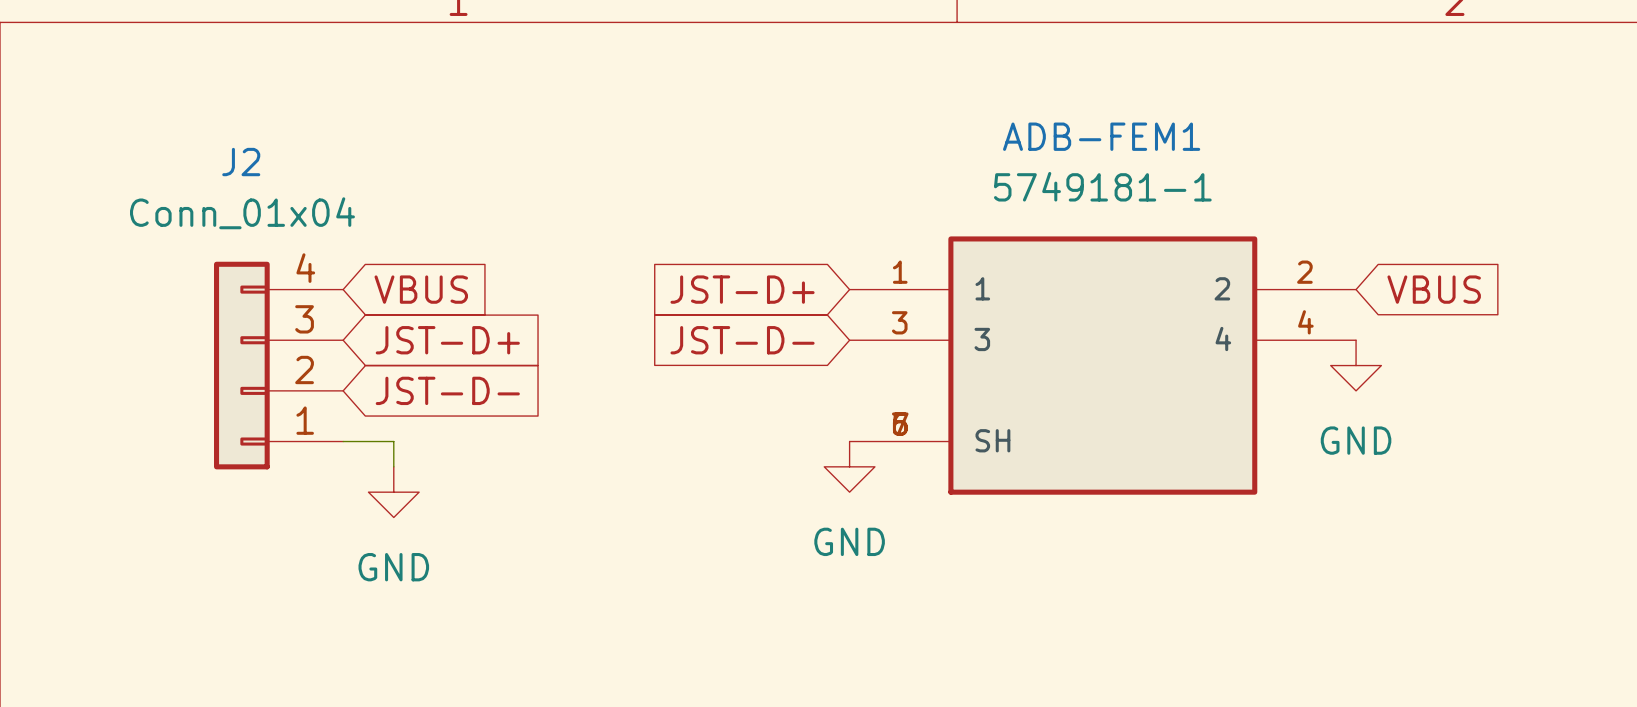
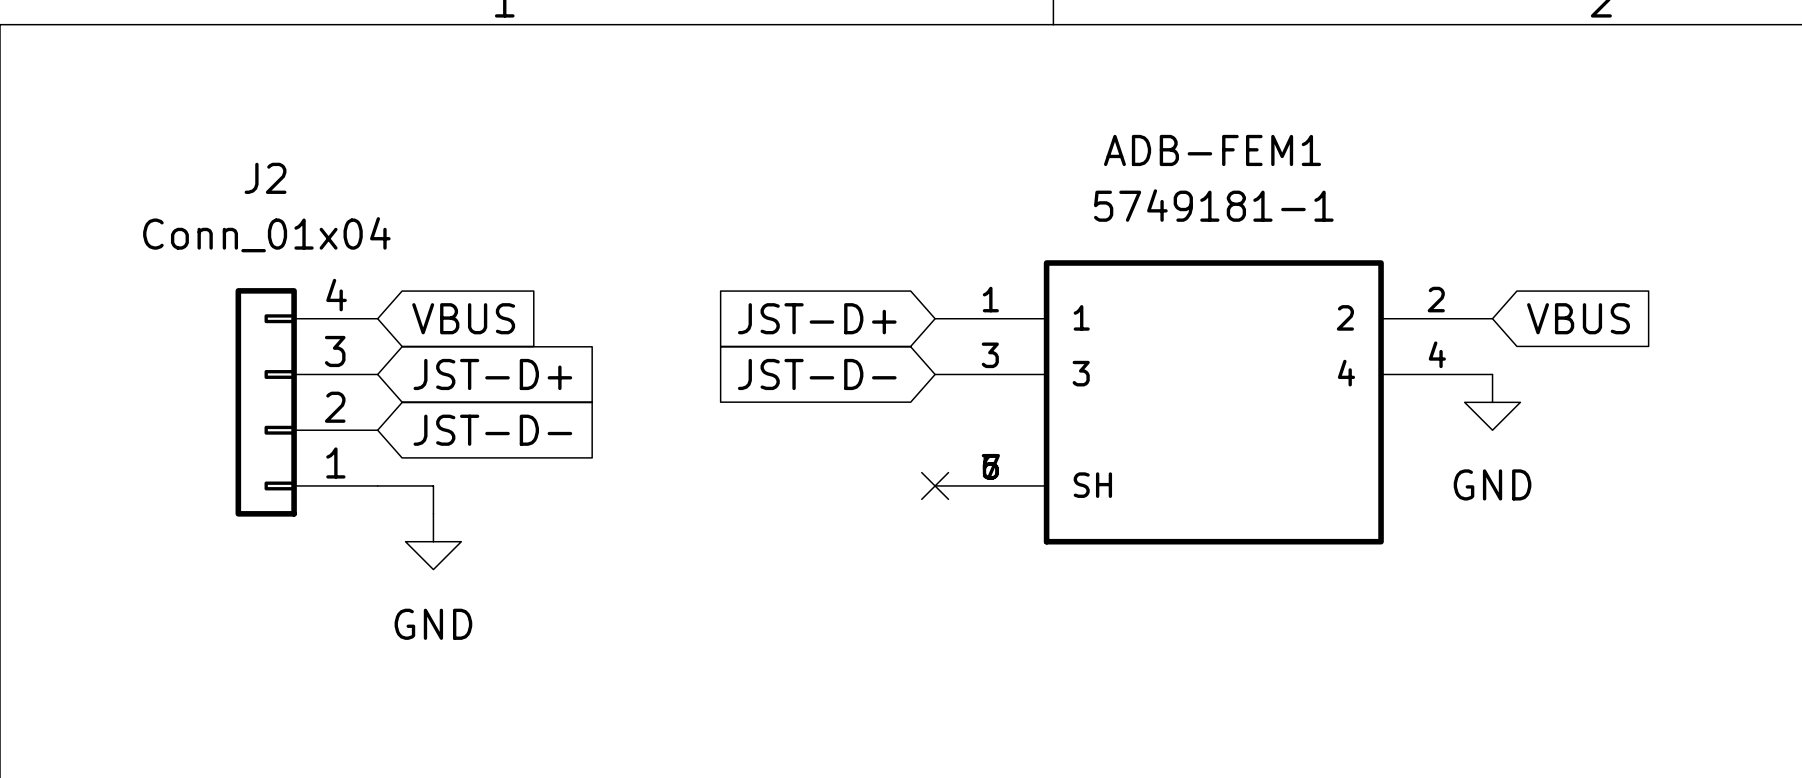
no-connect mark: none -> (935, 485)
power symbol: GND (849, 466) -> none

